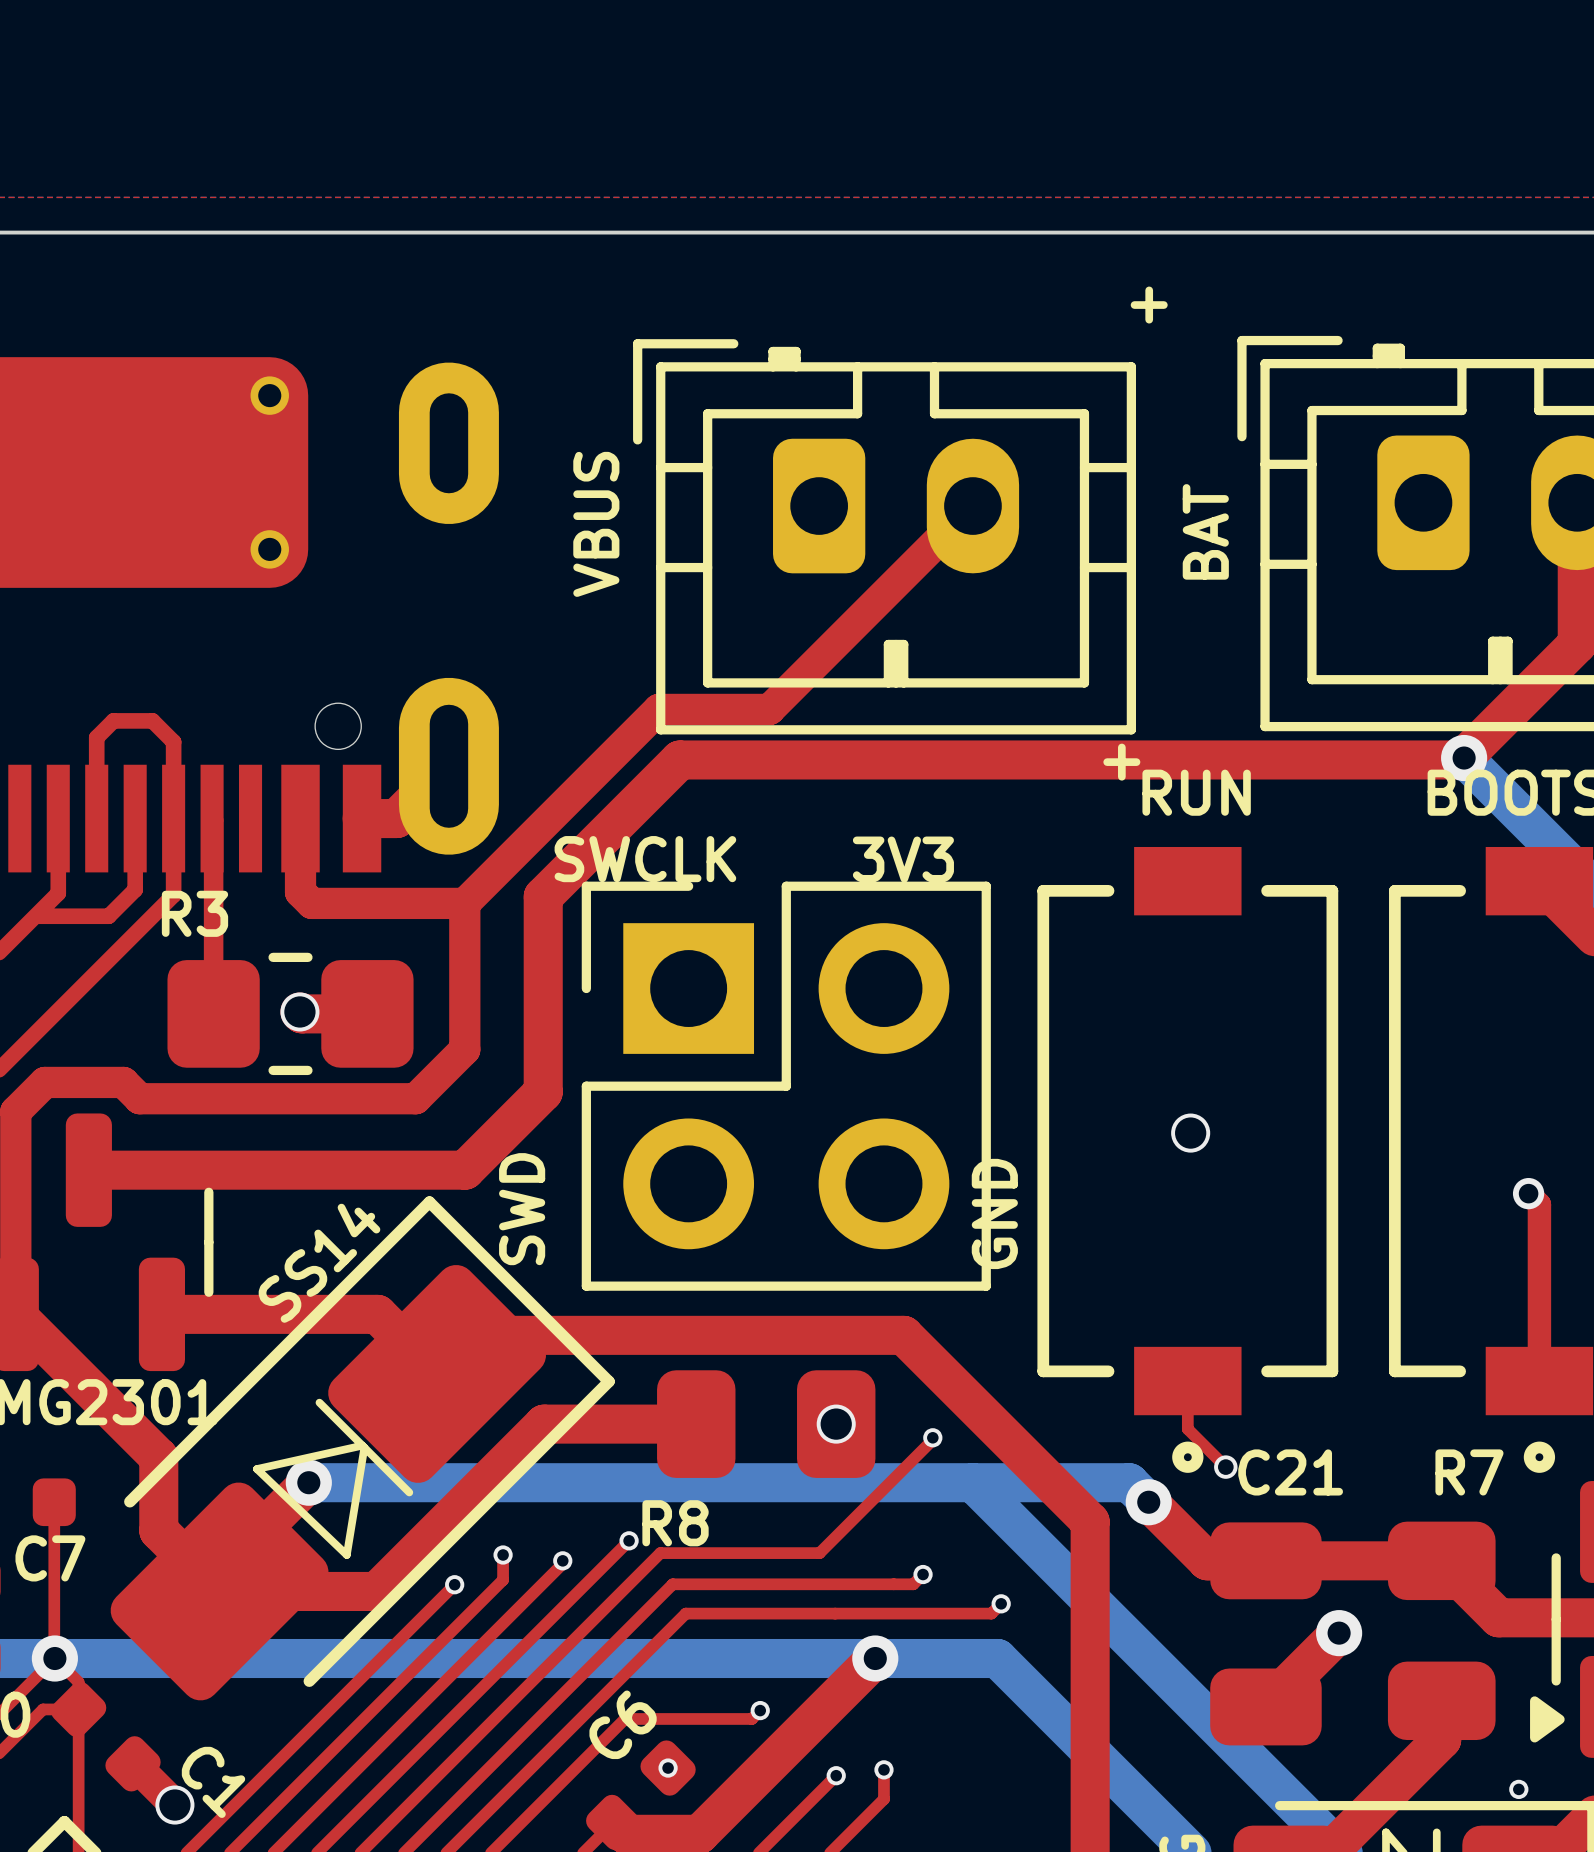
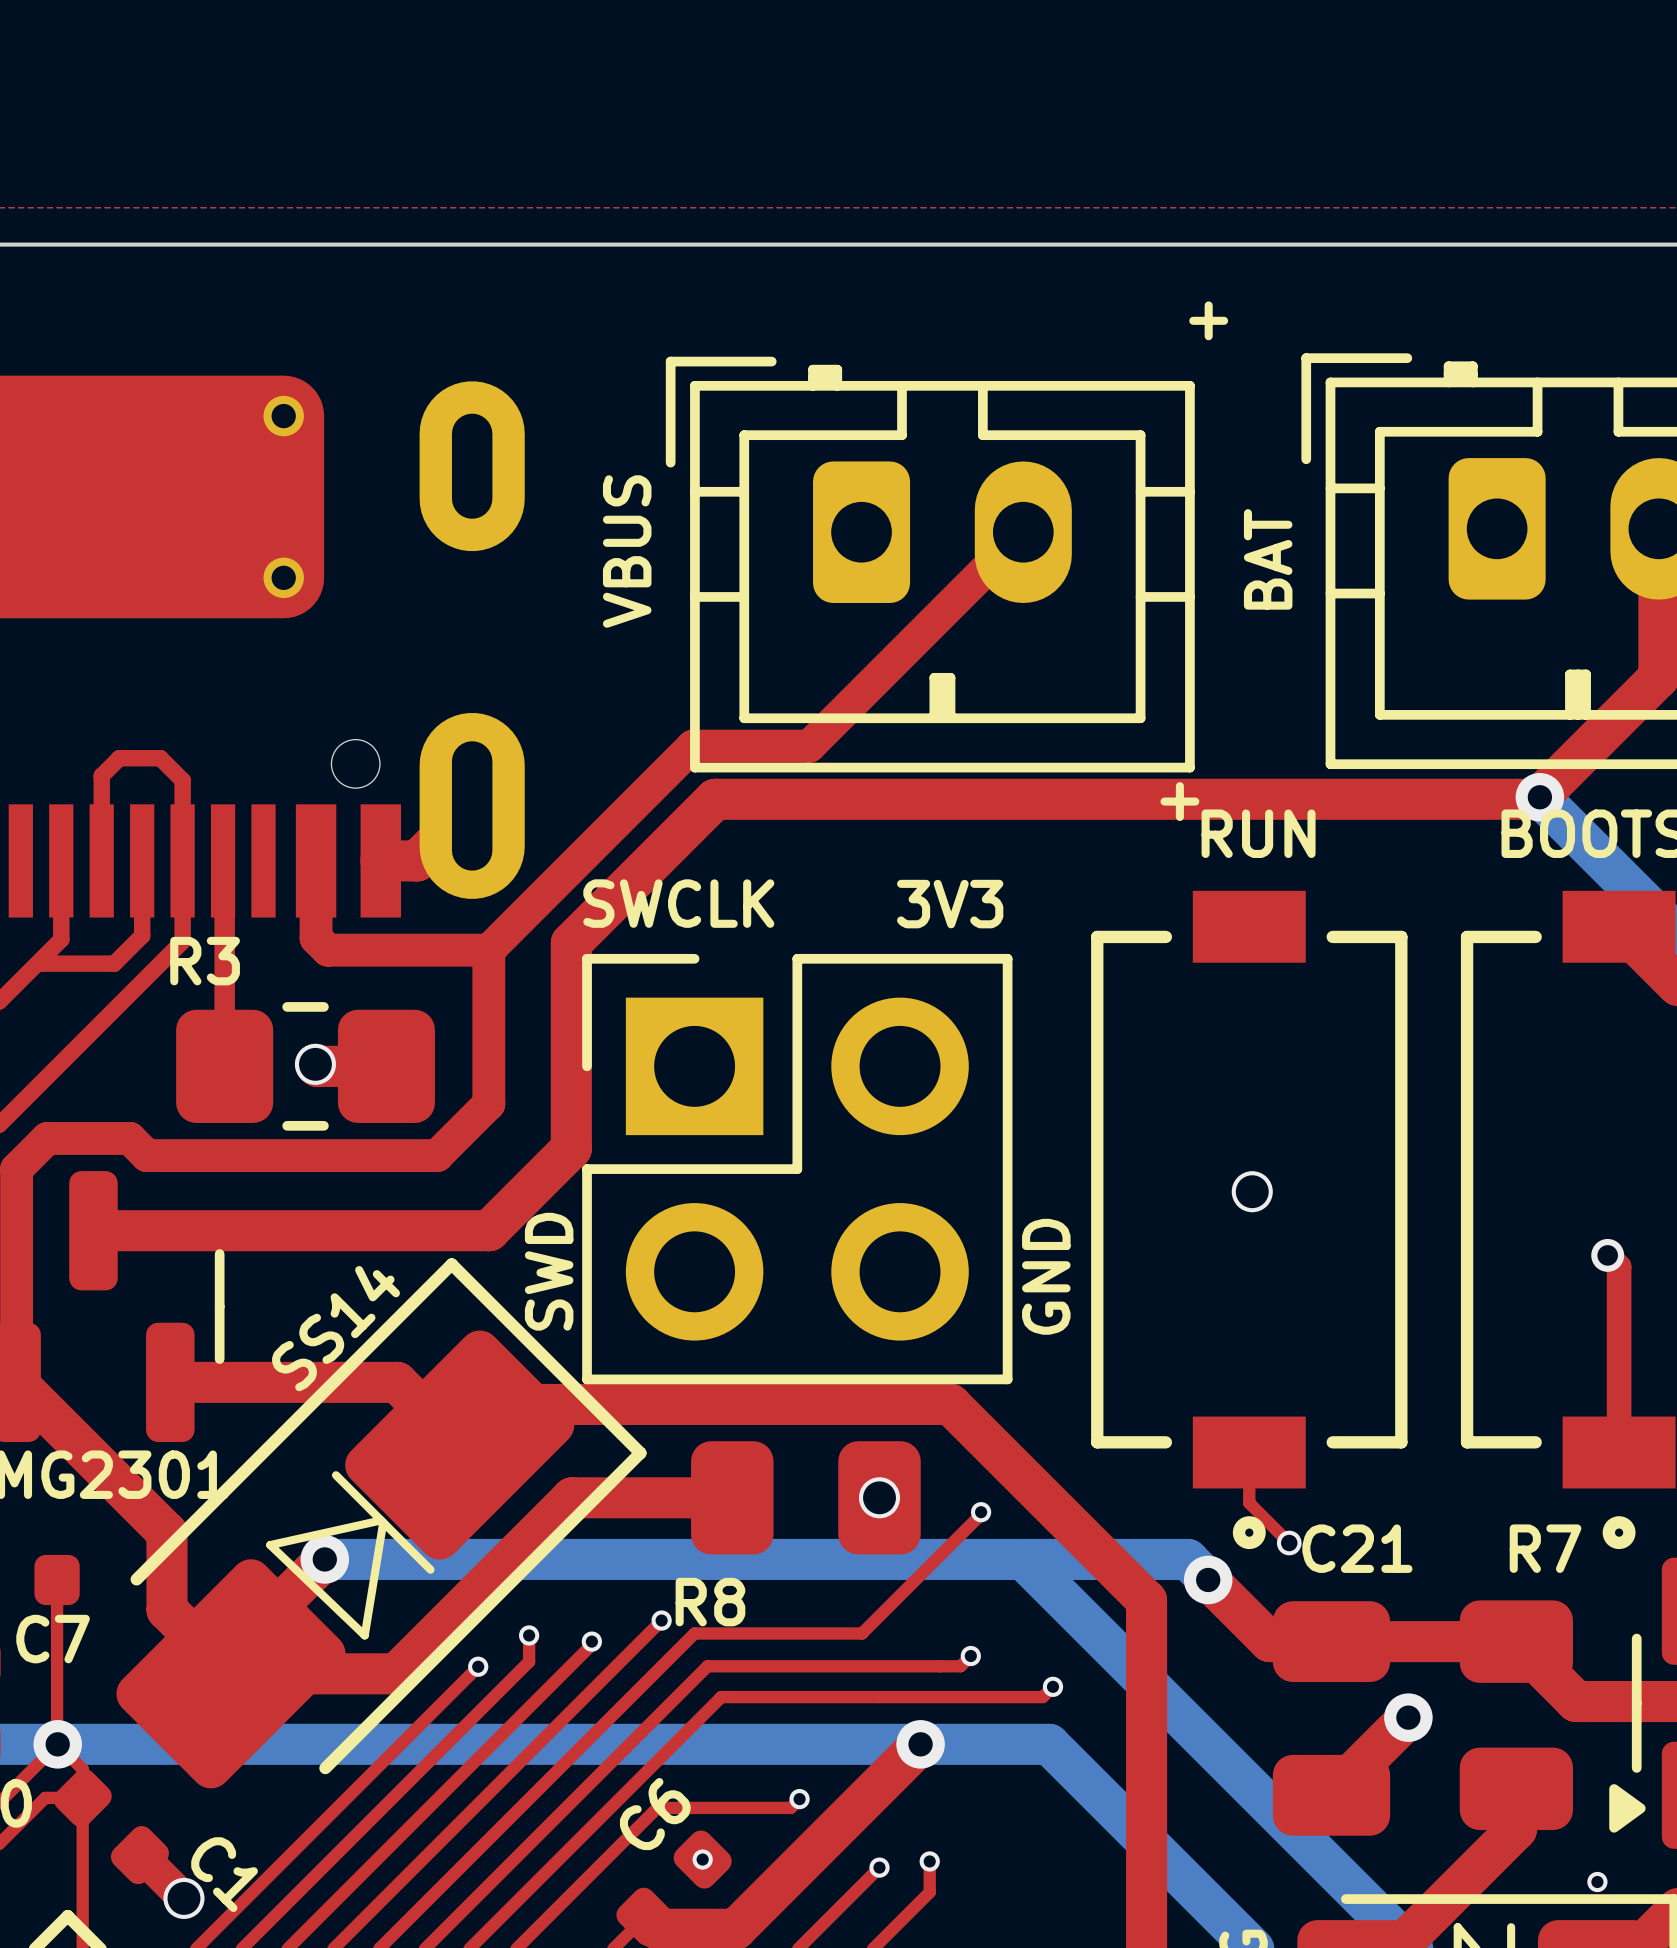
part position: (786, 1086) -> (797, 1169)

